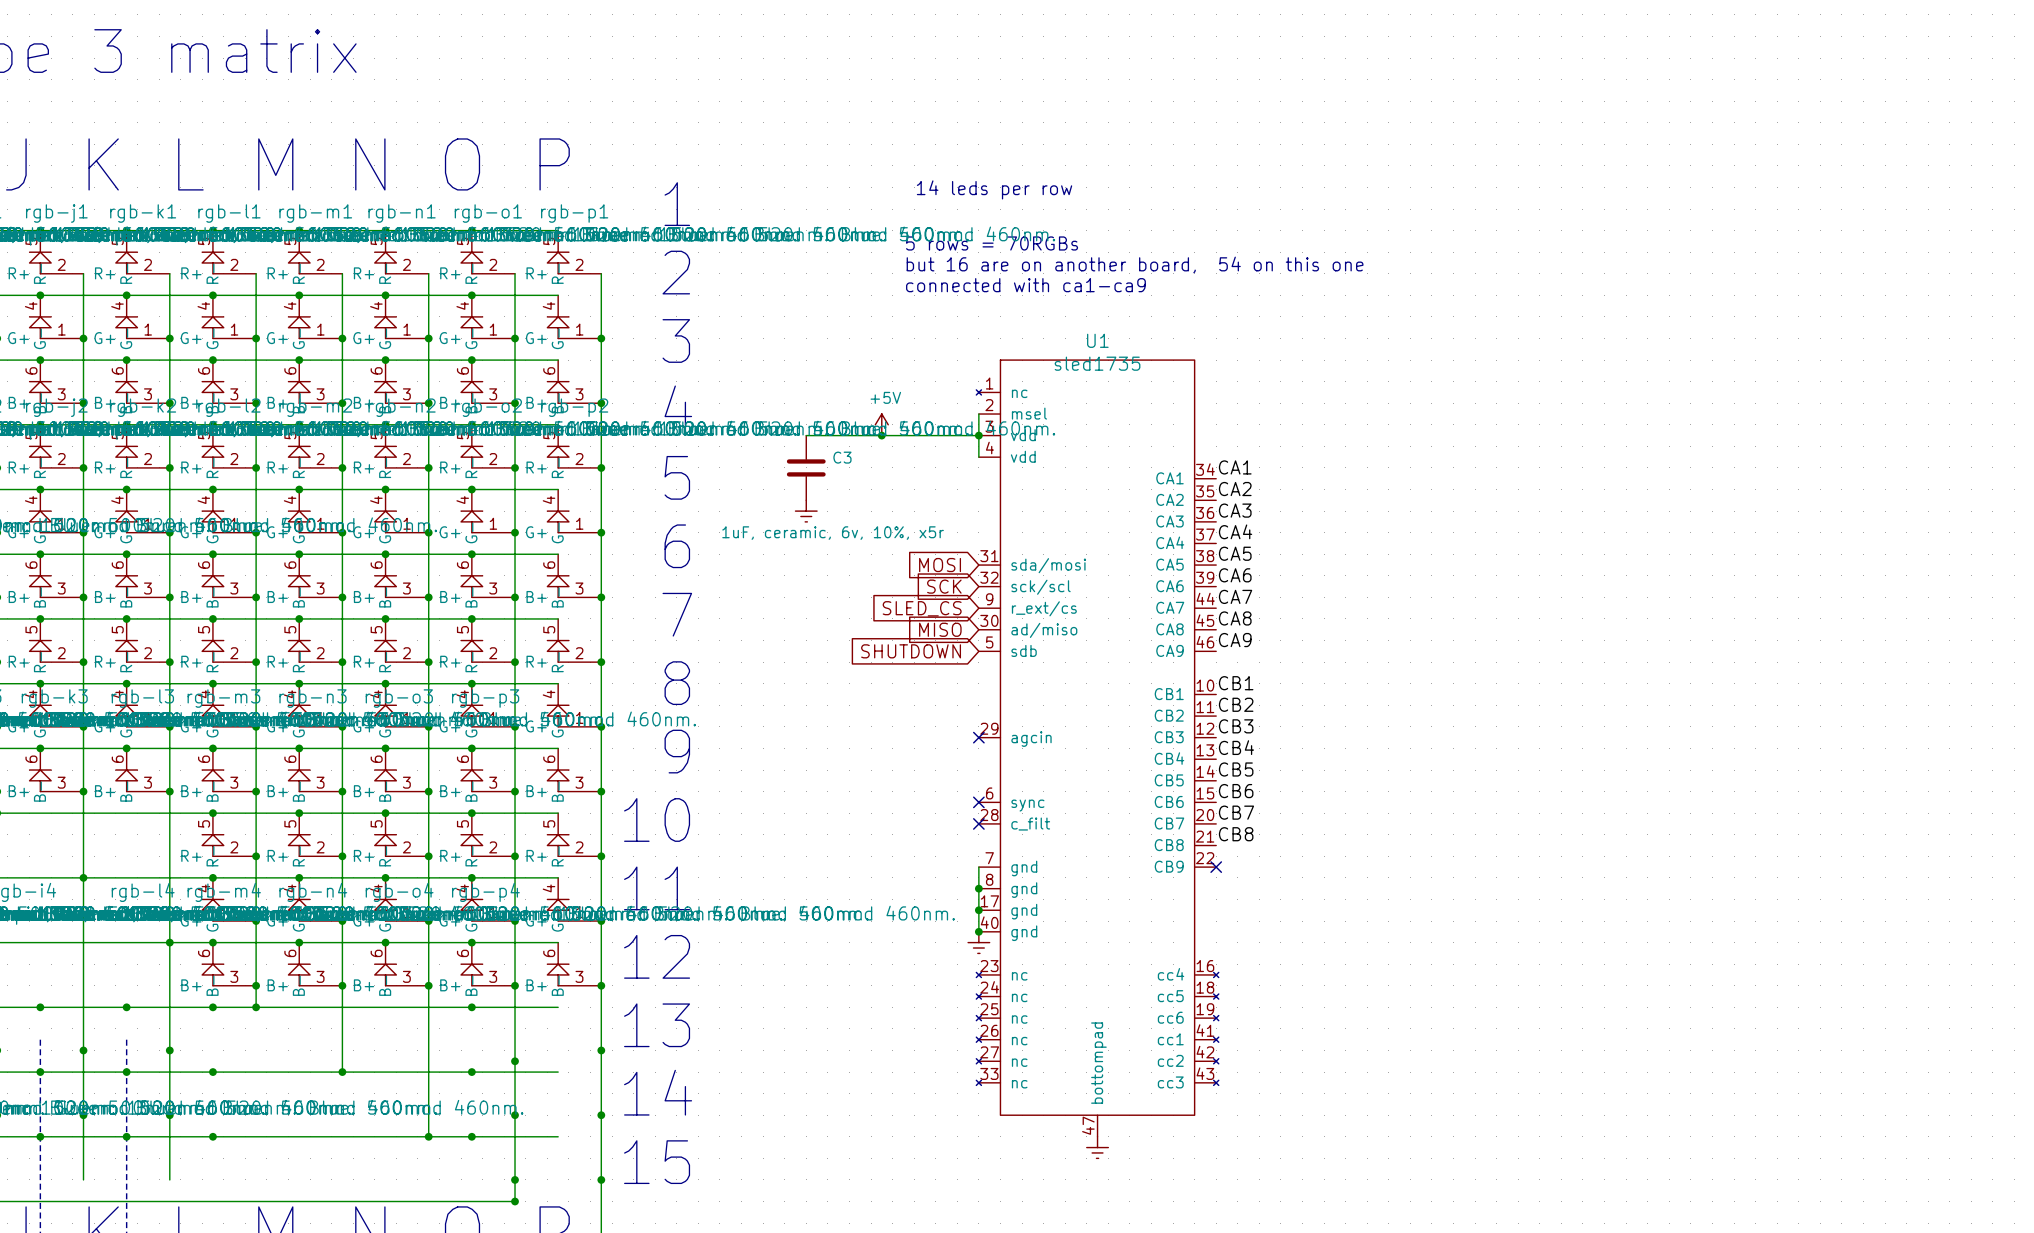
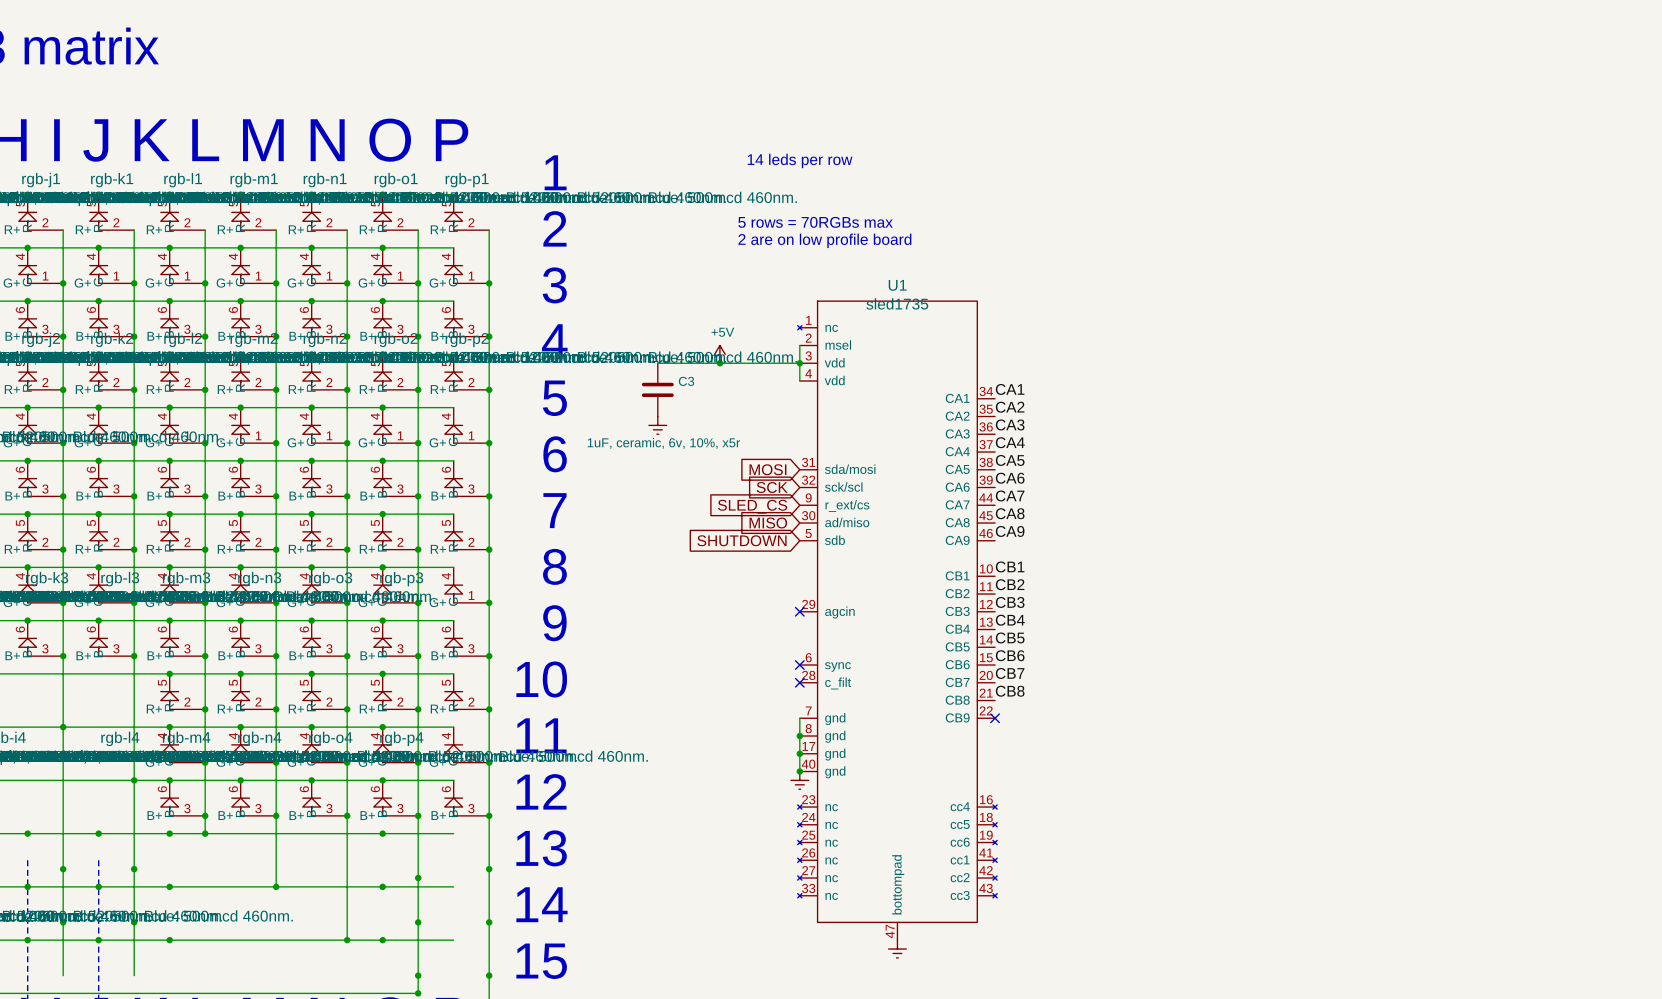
text: 5 rows = 70RGBs (992, 243) -> none
text: but 16 are on another board, 54 on this one (1135, 264) -> 5 rows = 70RGBs max (815, 222)
text: connected with ca1-ca9 (1025, 285) -> 2 are on low profile board (824, 240)

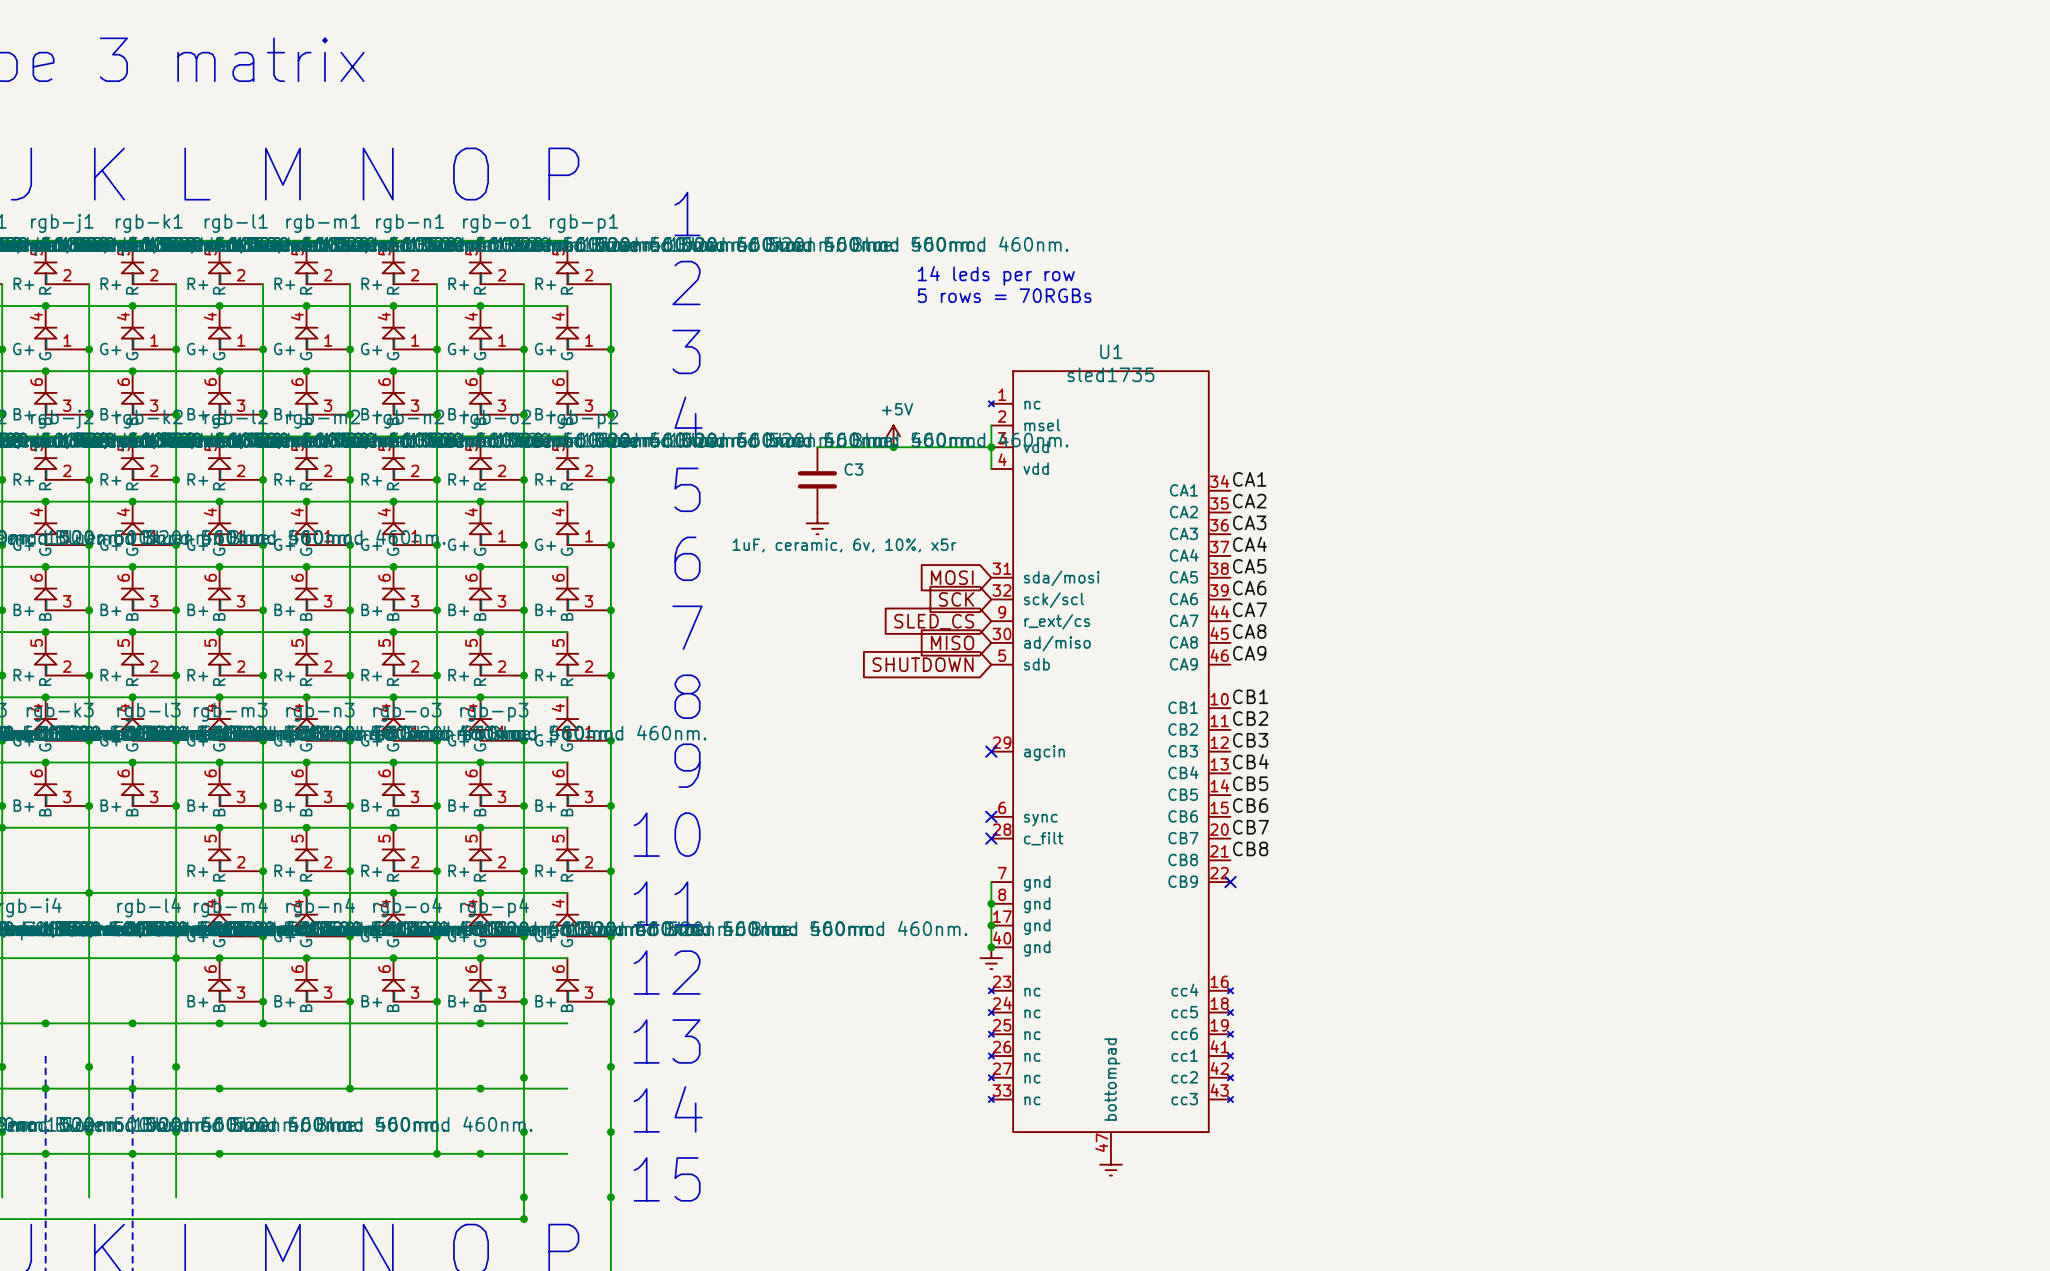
text: 14 leds per row (800, 160) -> none
text: 5 rows = 70RGBs max (815, 222) -> 14 leds per row (996, 275)
text: 2 are on low profile board (824, 240) -> 5 rows = 70RGBs (1004, 295)

